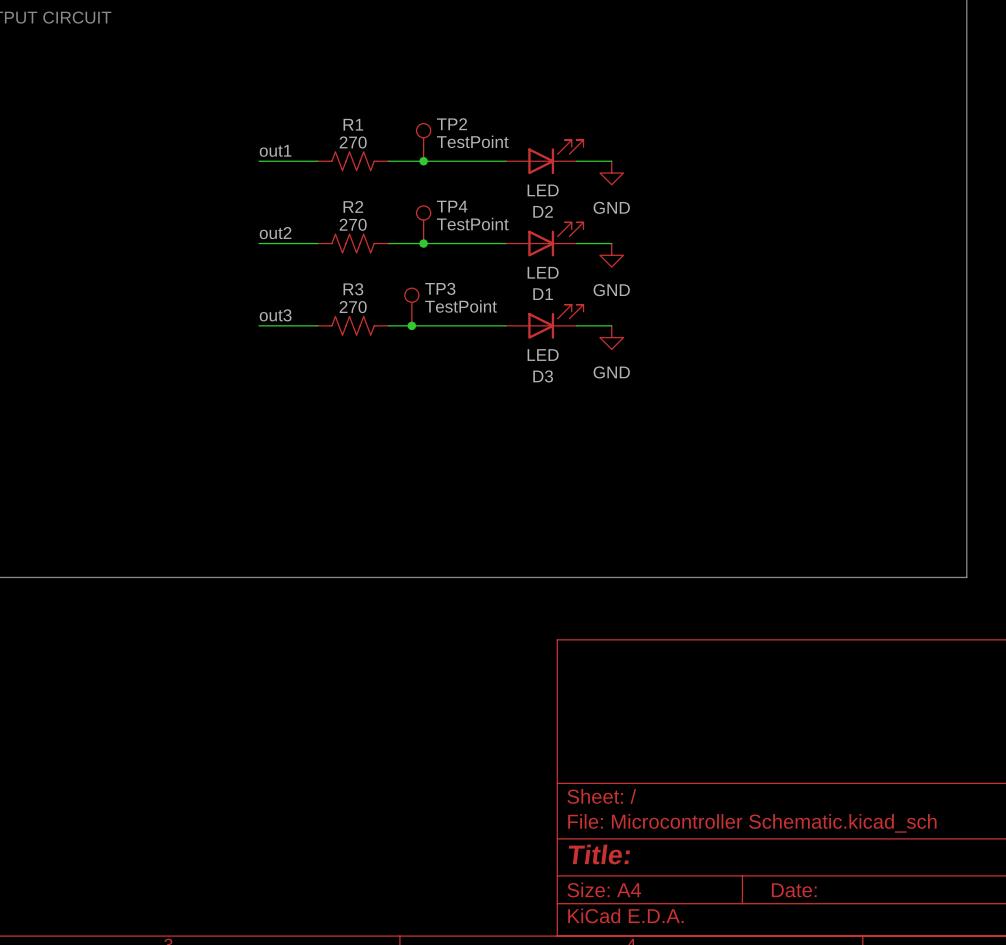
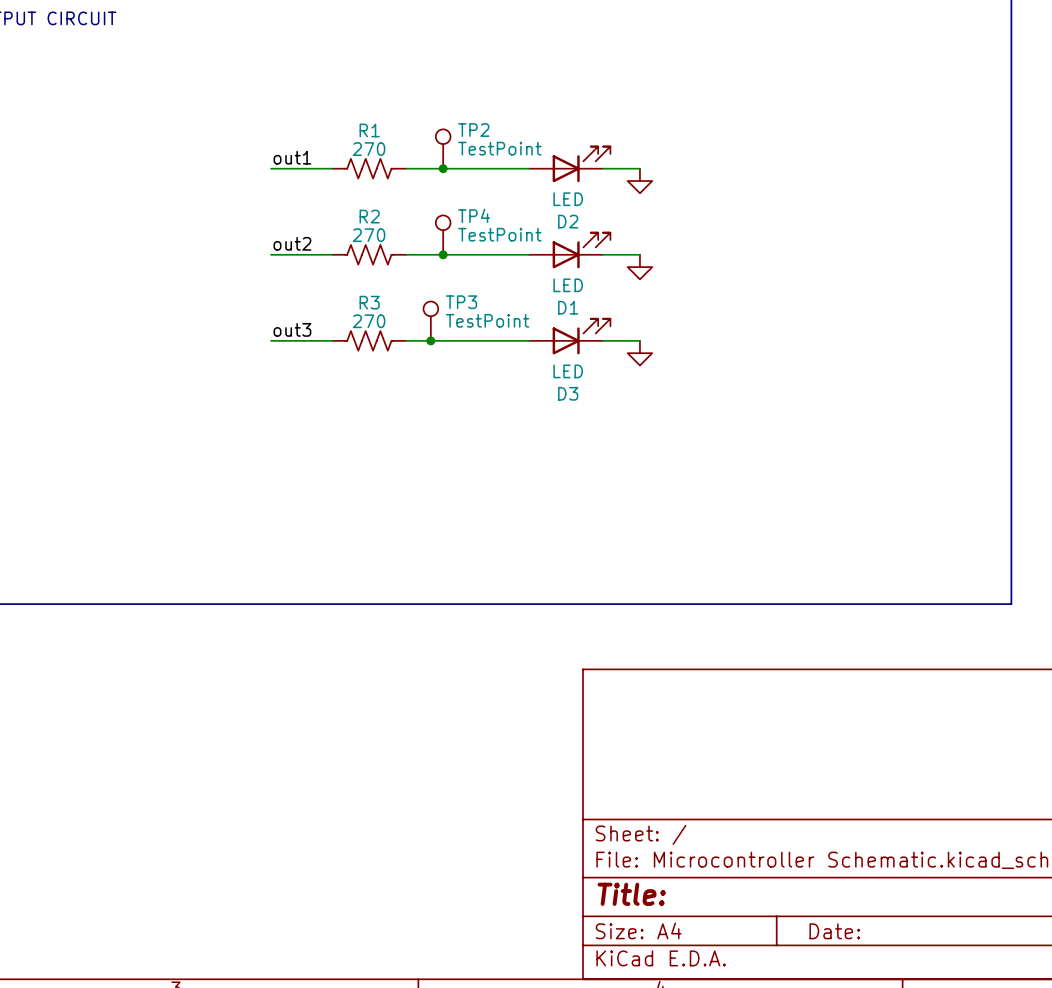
power symbol text: GND (611, 207) -> none
power symbol text: GND (611, 290) -> none
power symbol text: GND (611, 372) -> none

